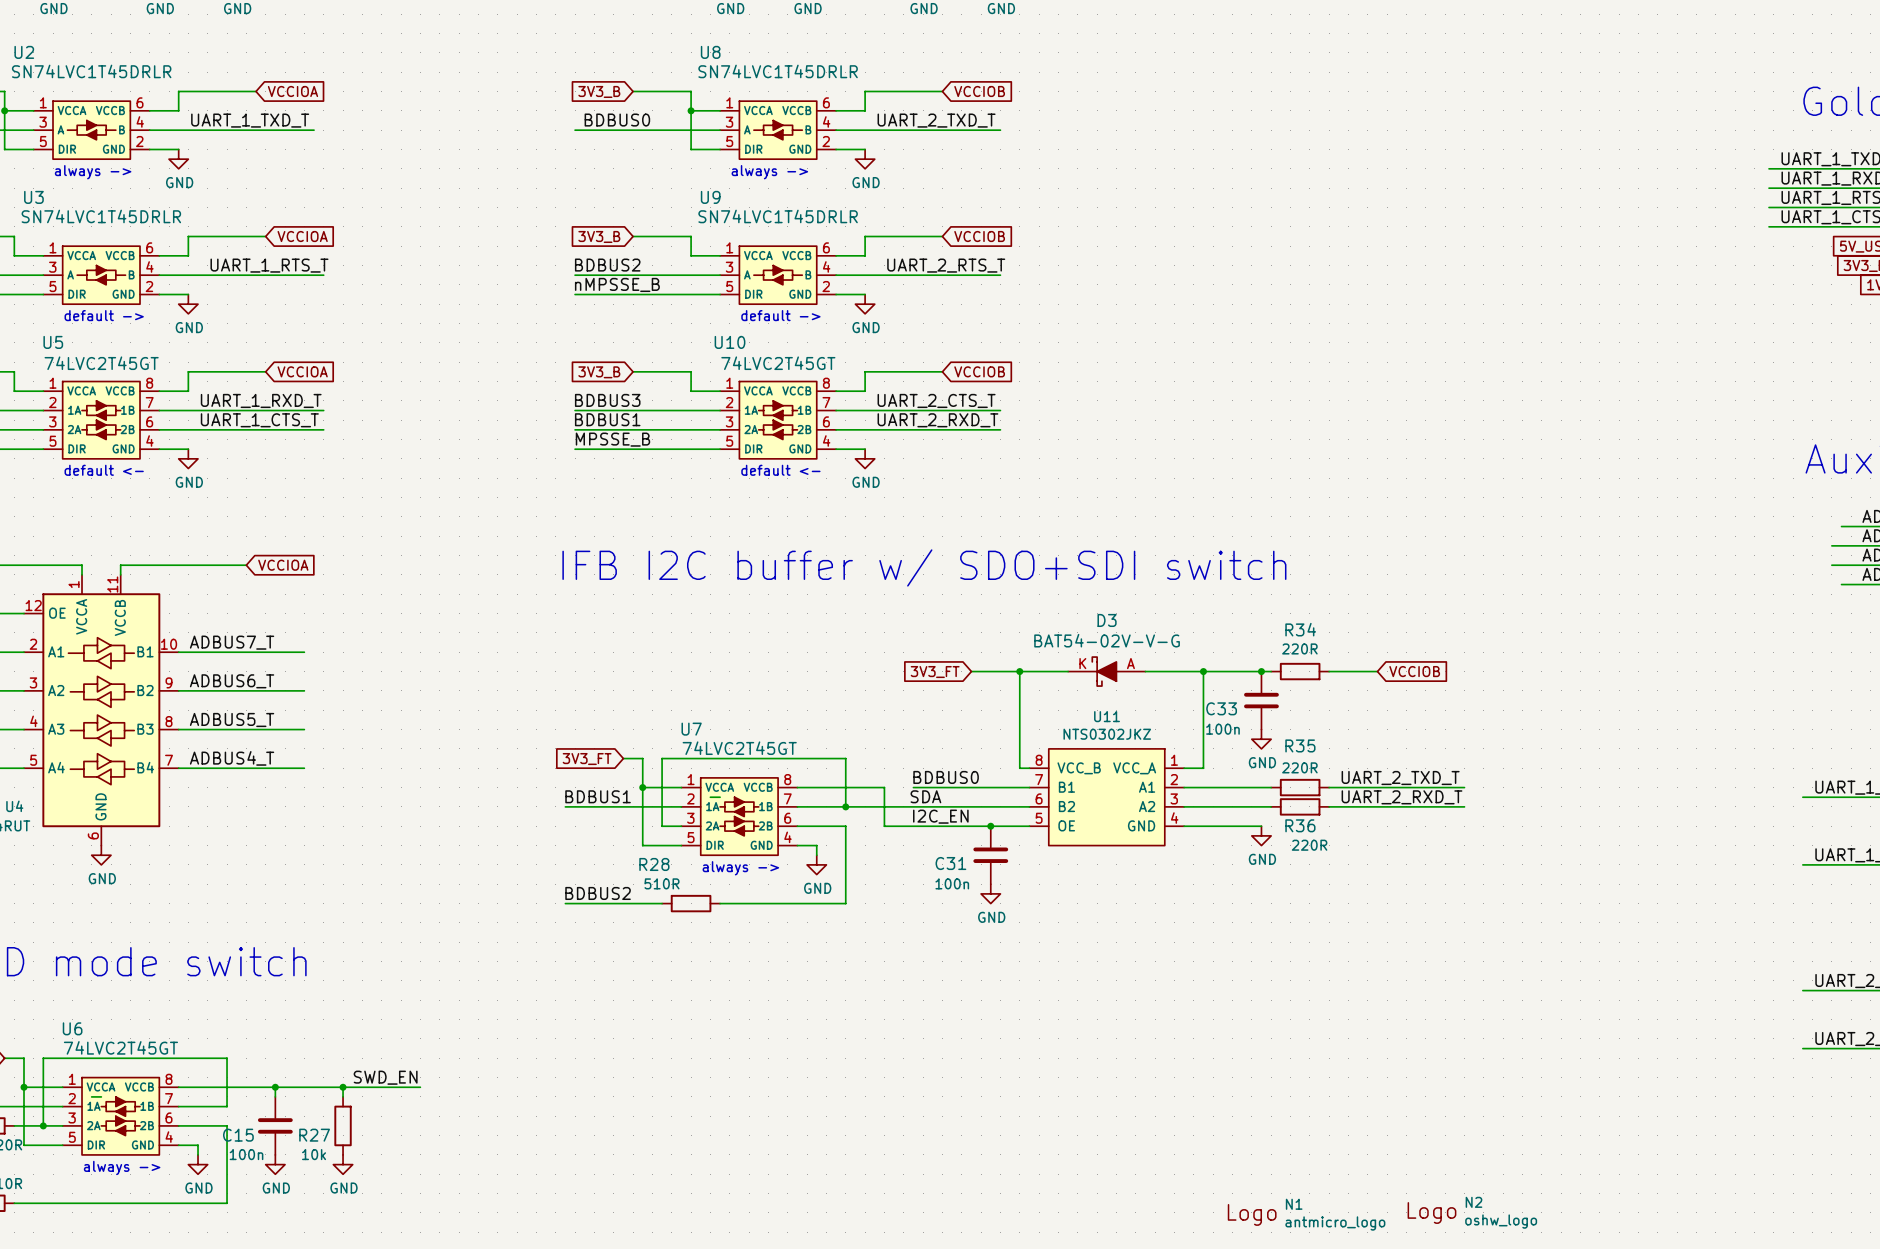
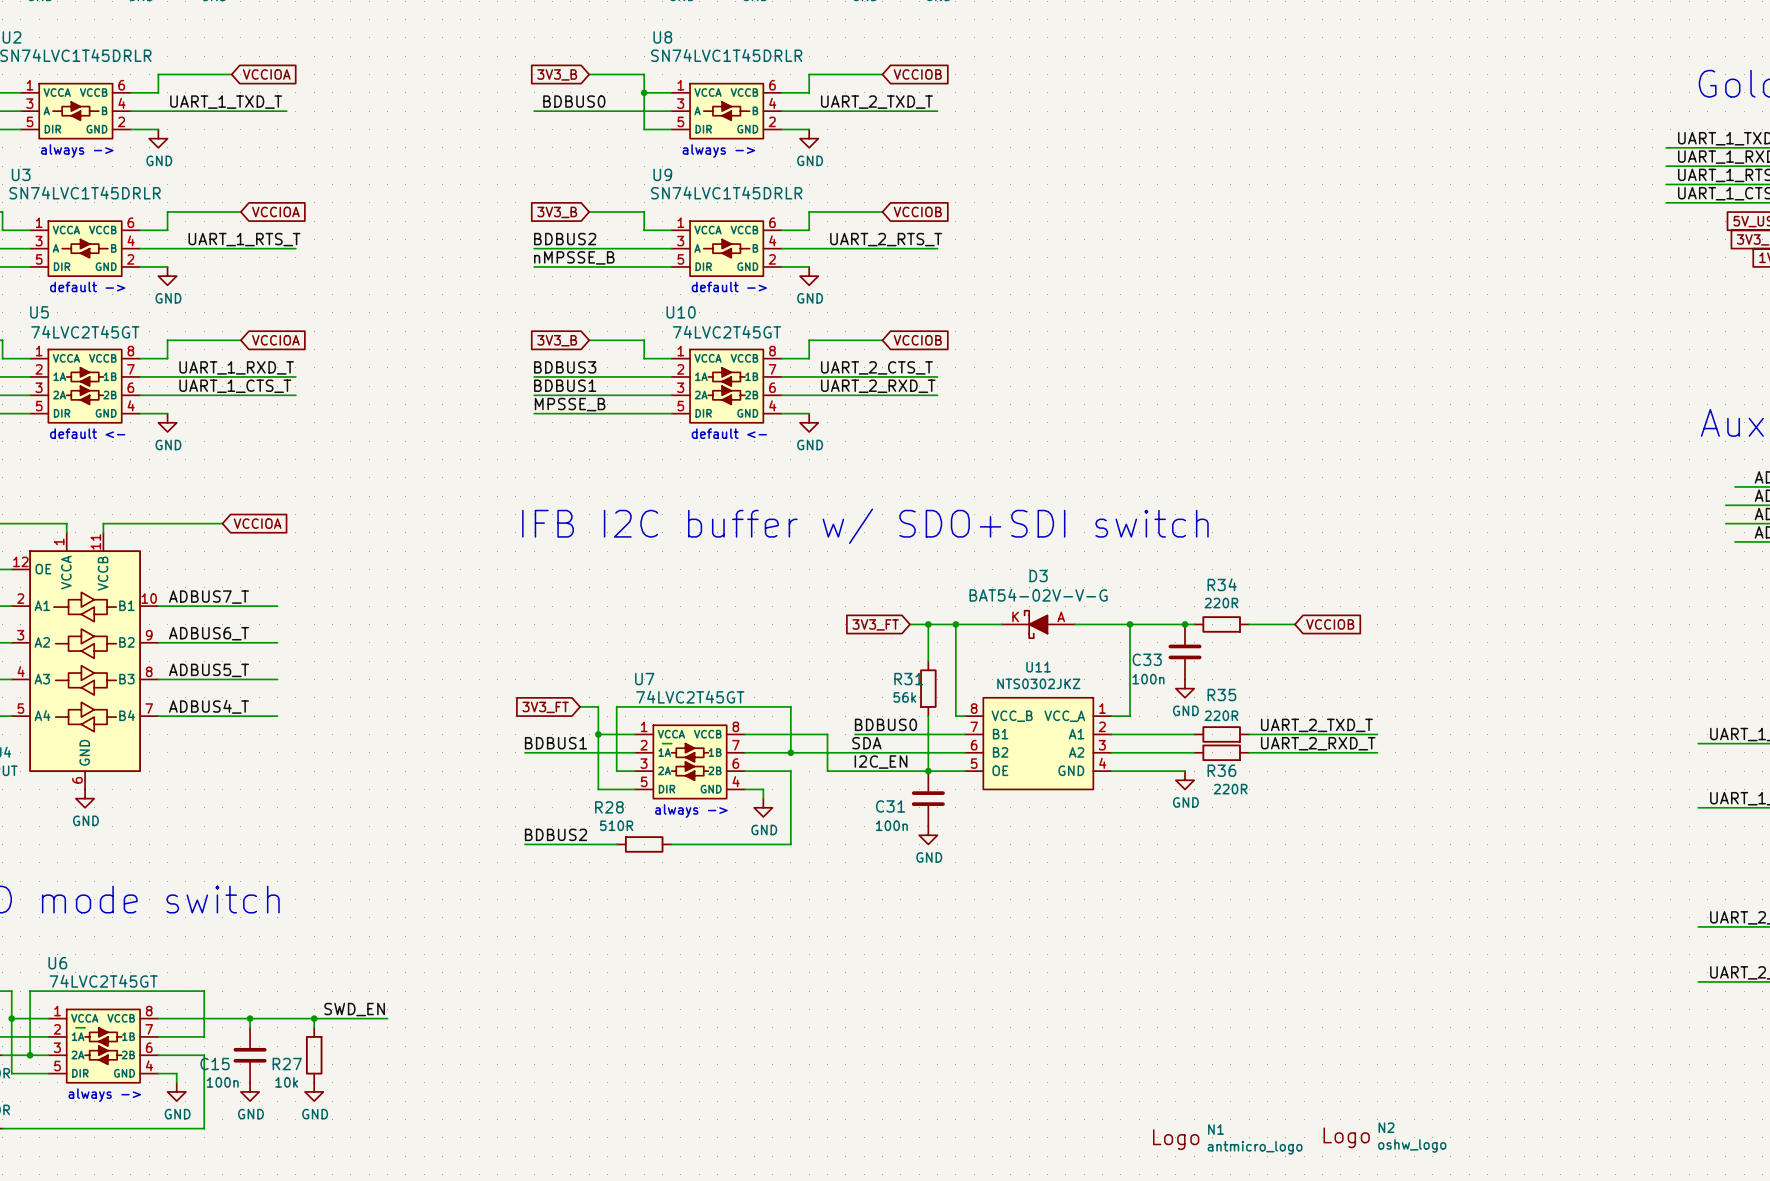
wire: none -> (928, 624) (928, 661)
junction: none -> (928, 624)
R31: none -> (928, 688)
wire: none -> (928, 716) (928, 771)

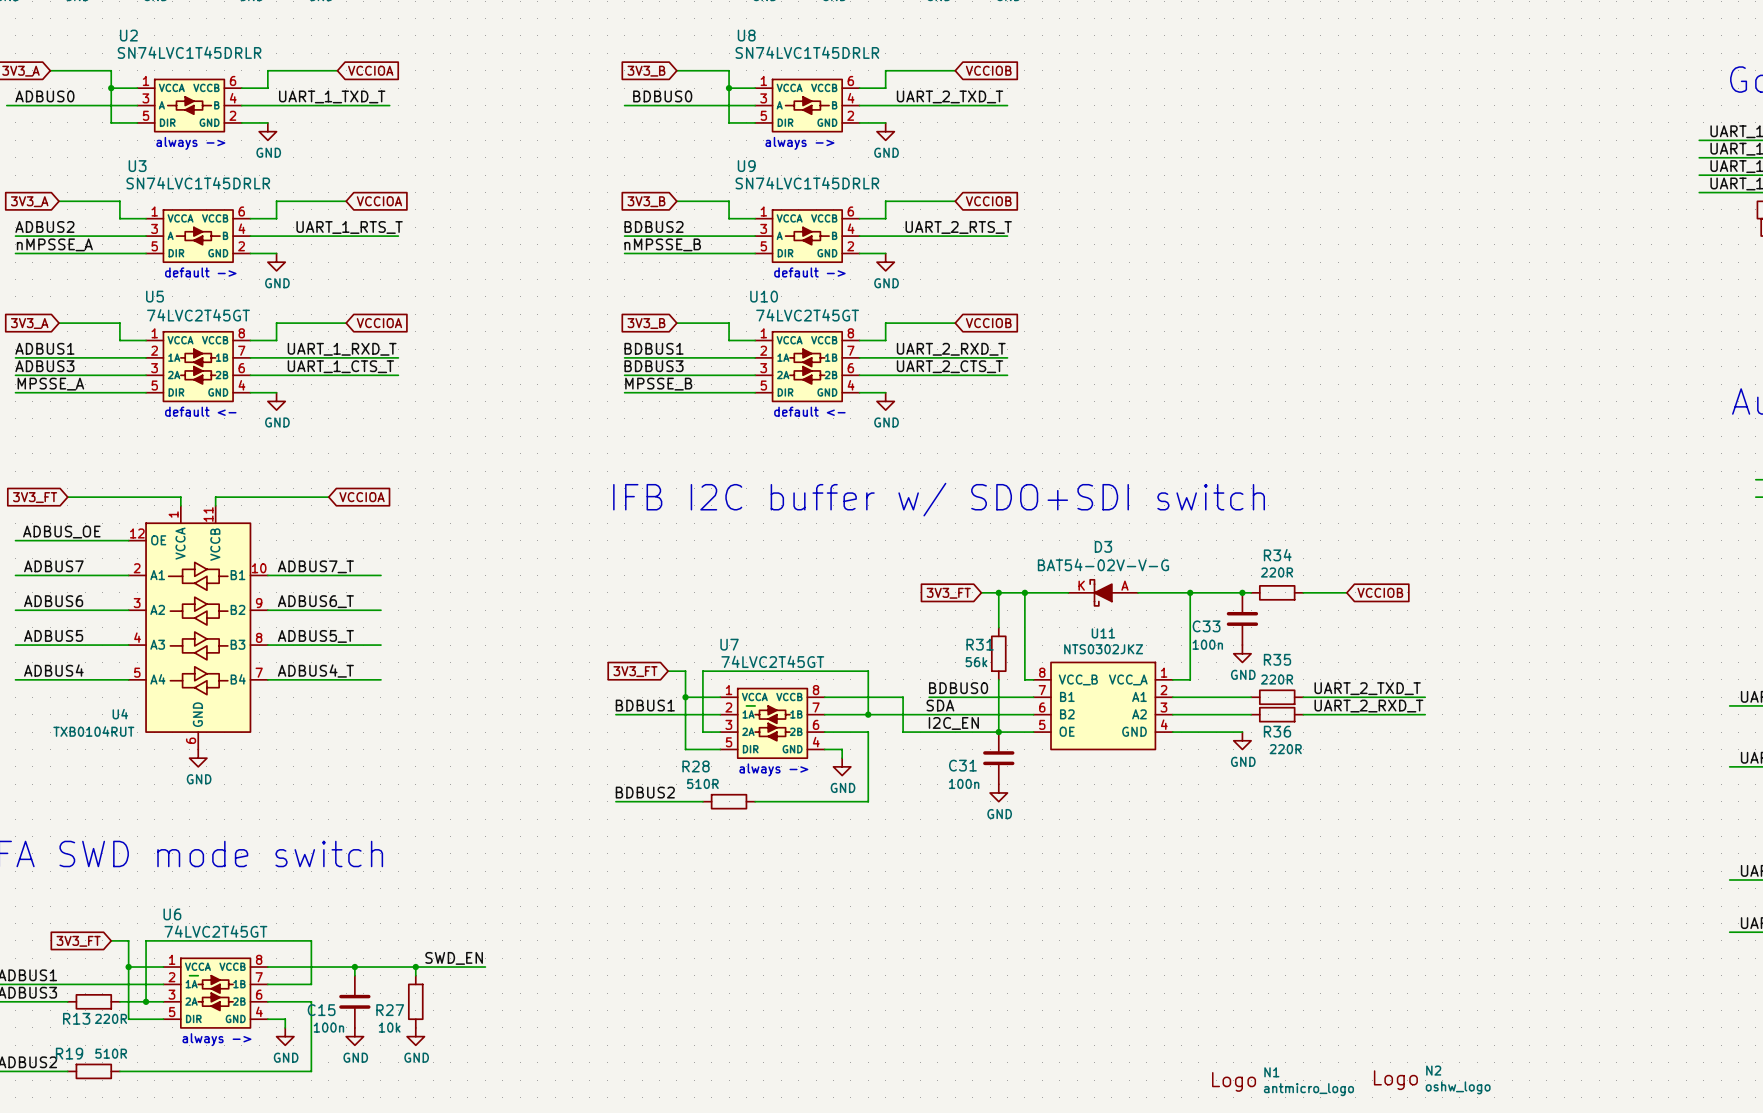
label: BDBUS3 (565, 367) -> BDBUS1 (654, 348)
label: UART_2_CTS_T (876, 367) -> UART_2_RXD_T (951, 349)
label: BDBUS1 (565, 385) -> BDBUS3 (654, 366)
label: UART_2_RXD_T (878, 386) -> UART_2_CTS_T (950, 366)

